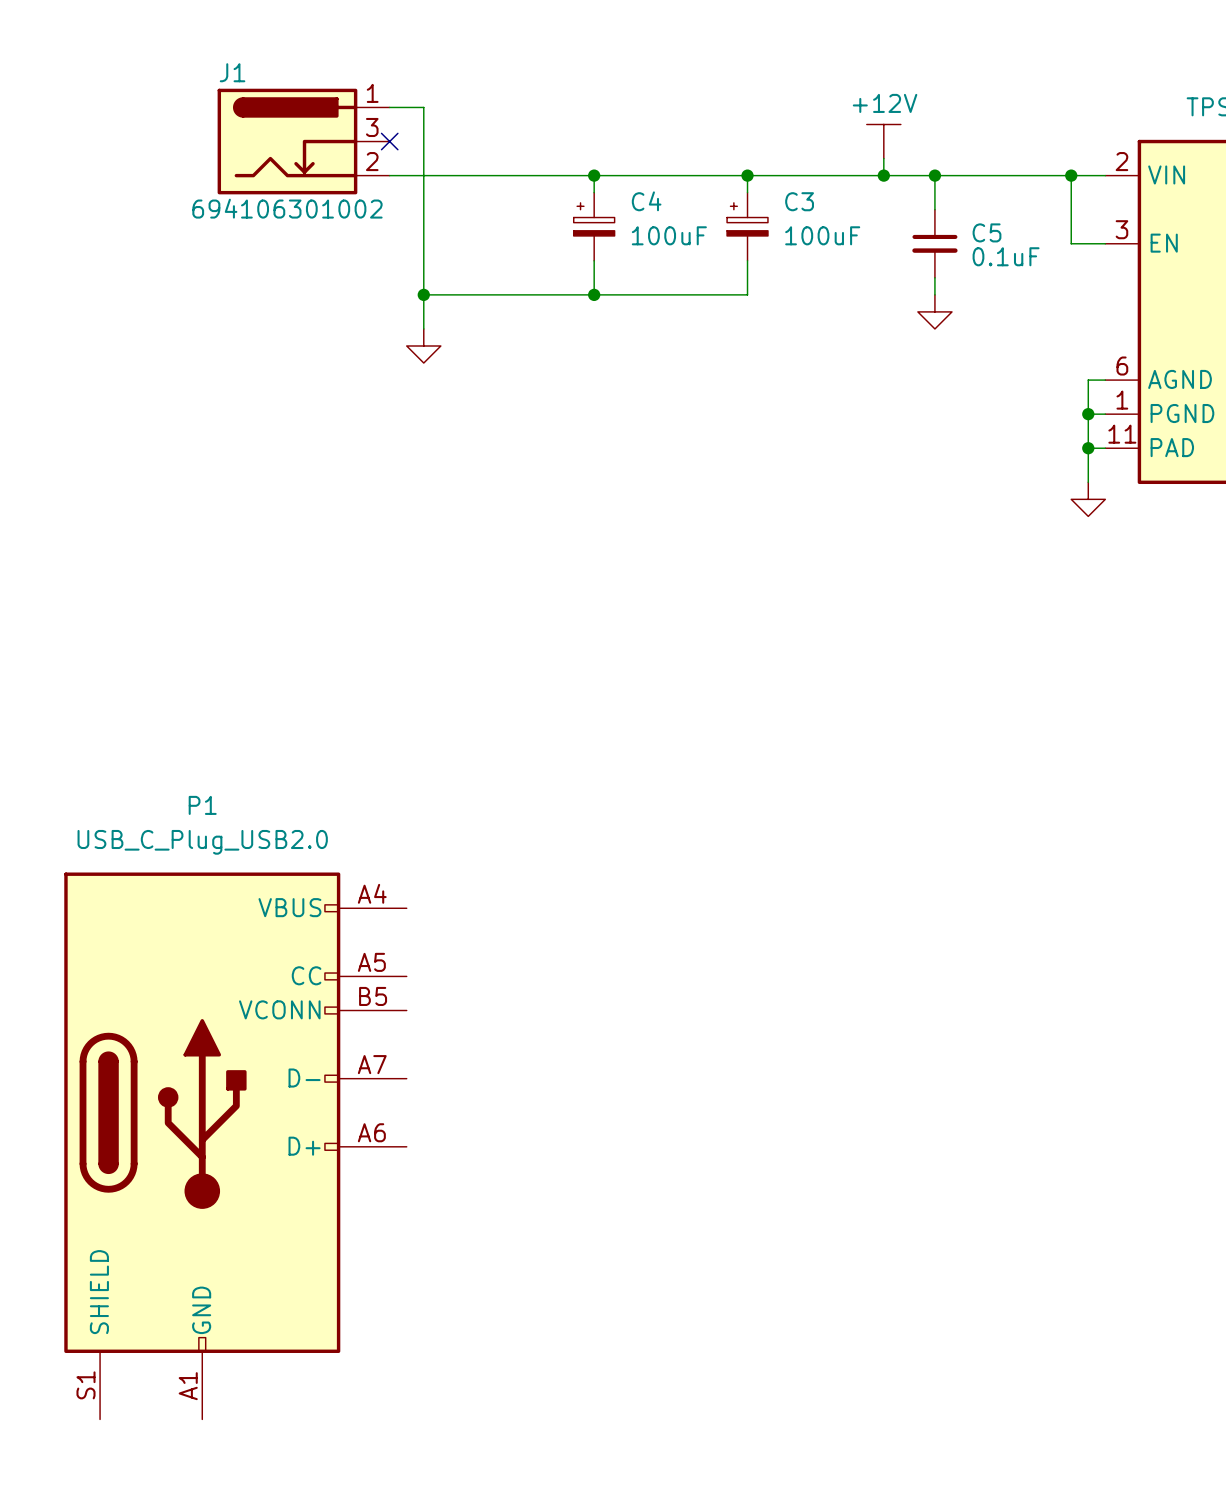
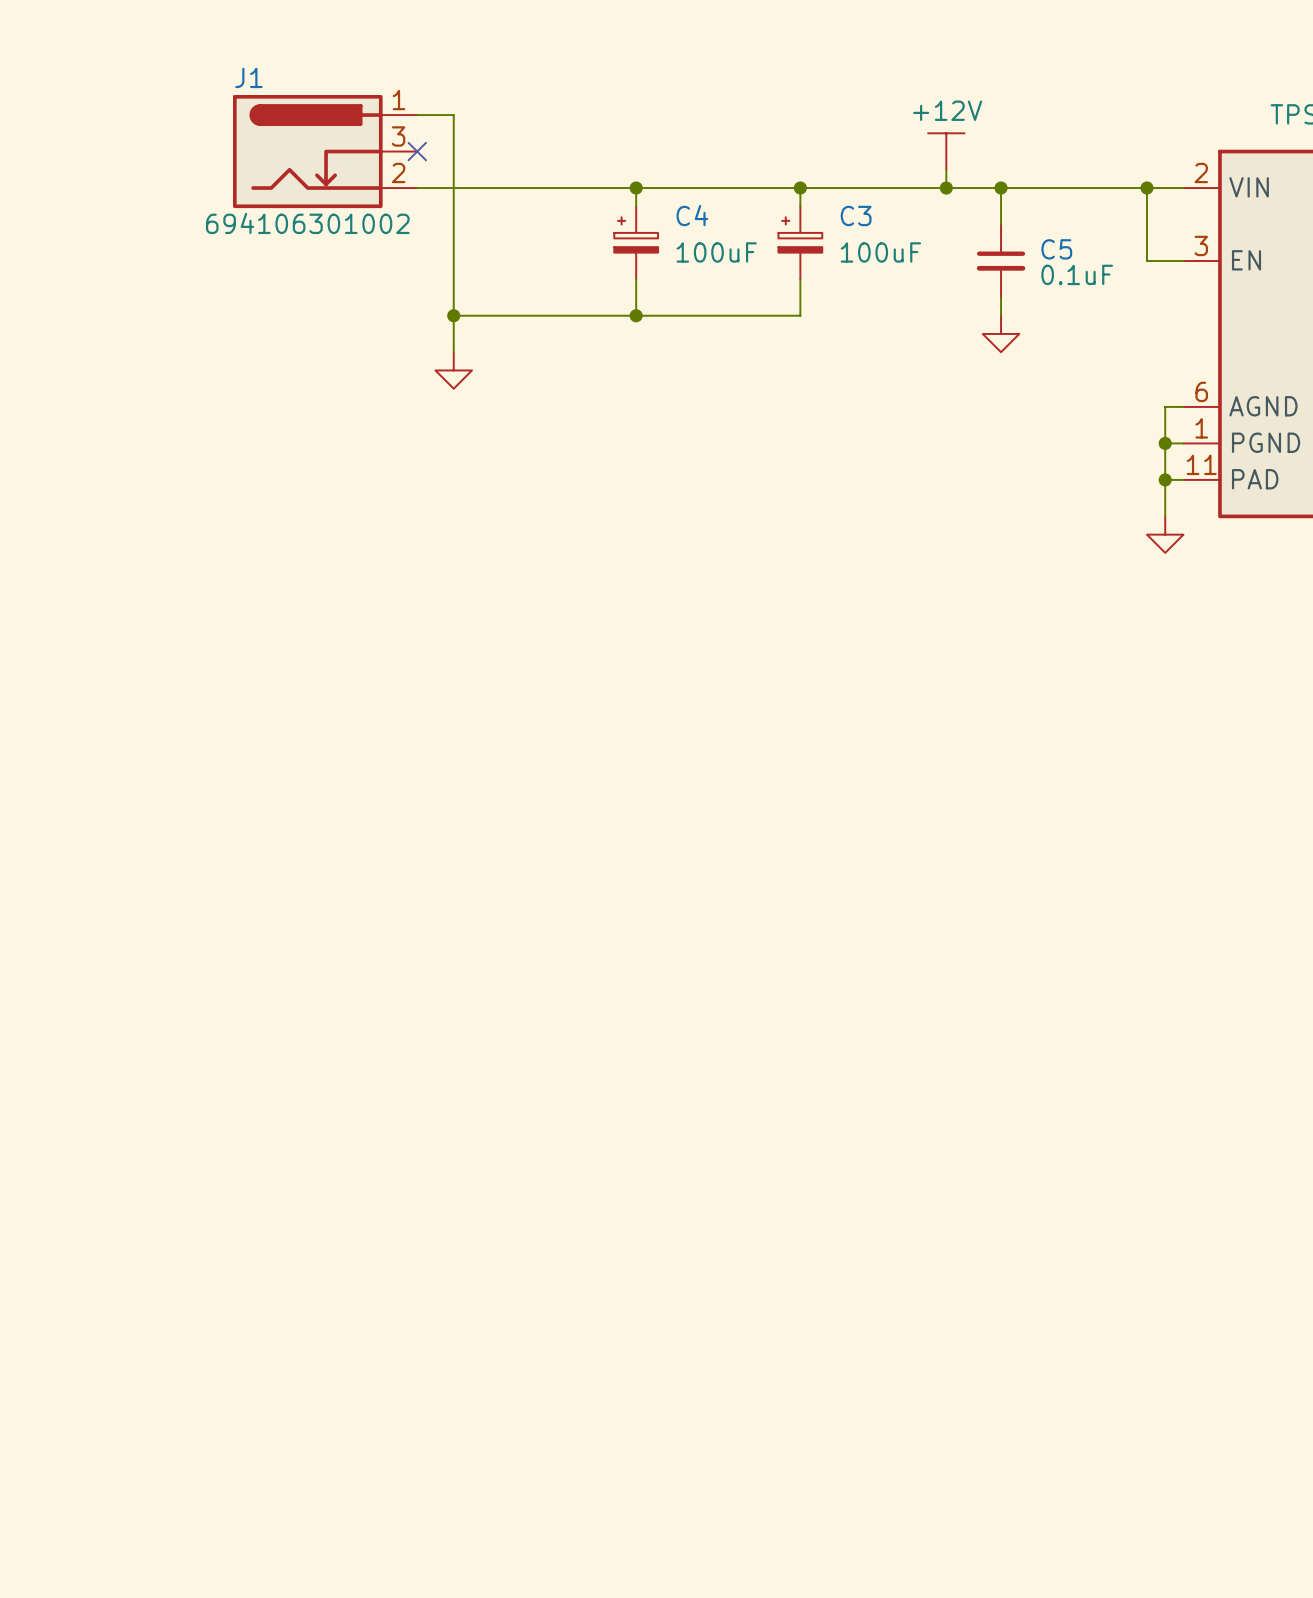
P1: USB_C_Plug_USB2.0 (235, 1145) -> none

